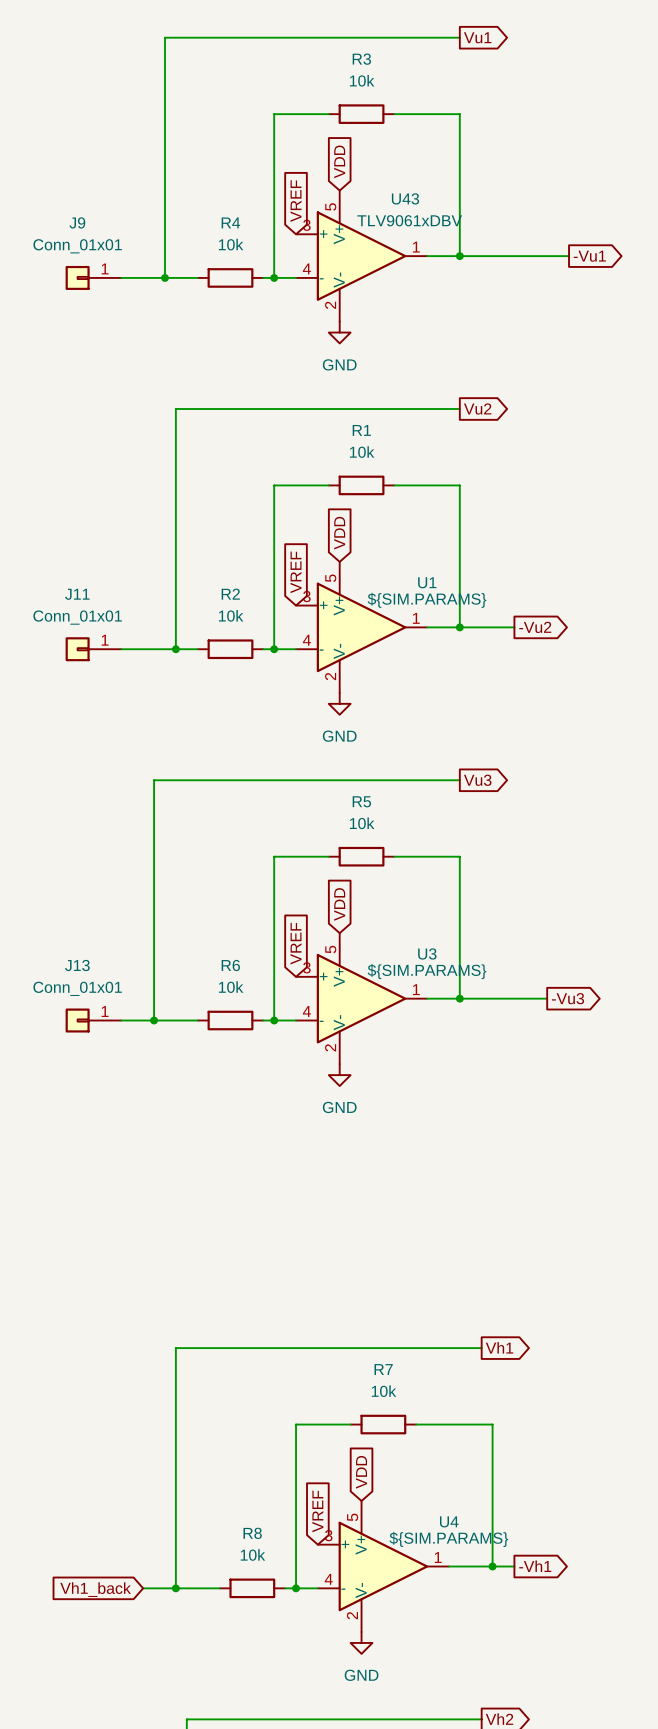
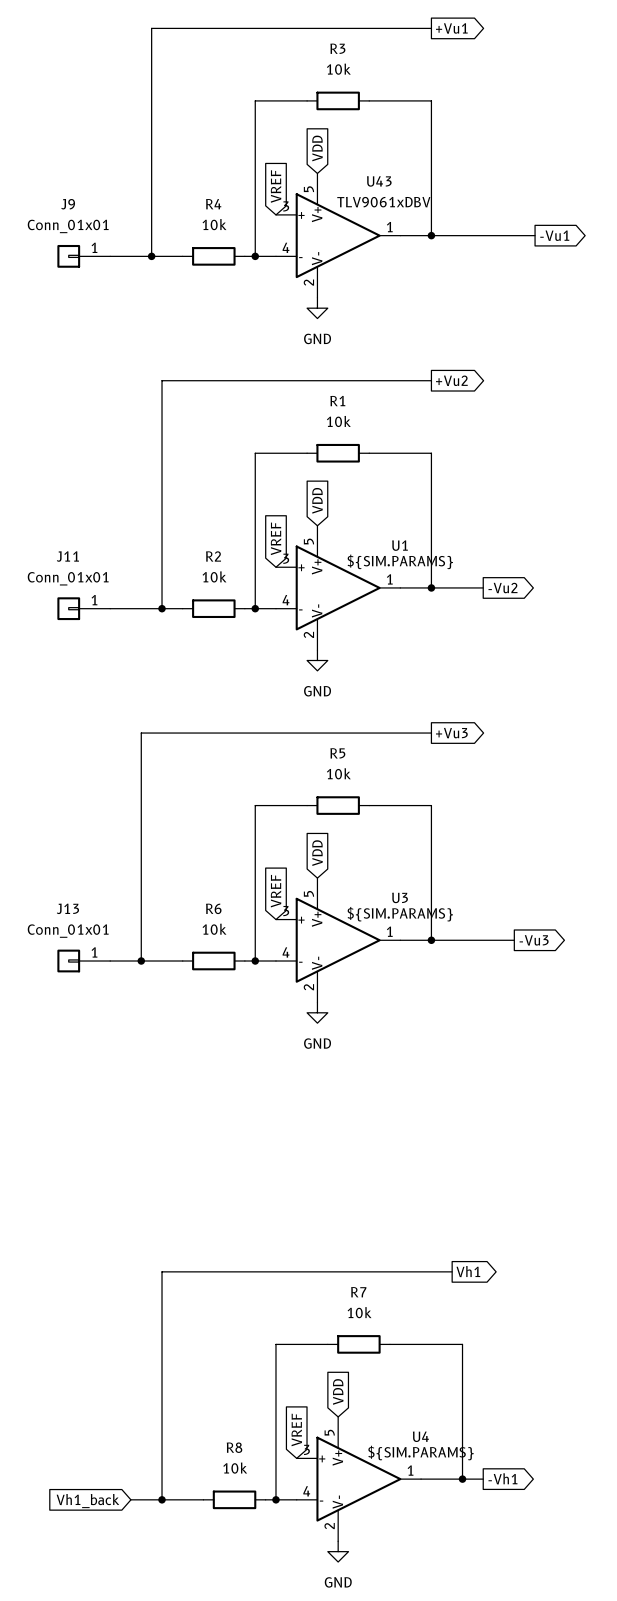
global label: Vu1 (477, 37) -> +Vu1 (451, 28)
global label: Vu2 (477, 408) -> +Vu2 (451, 380)
global label: Vu3 (477, 780) -> +Vu3 (451, 733)

